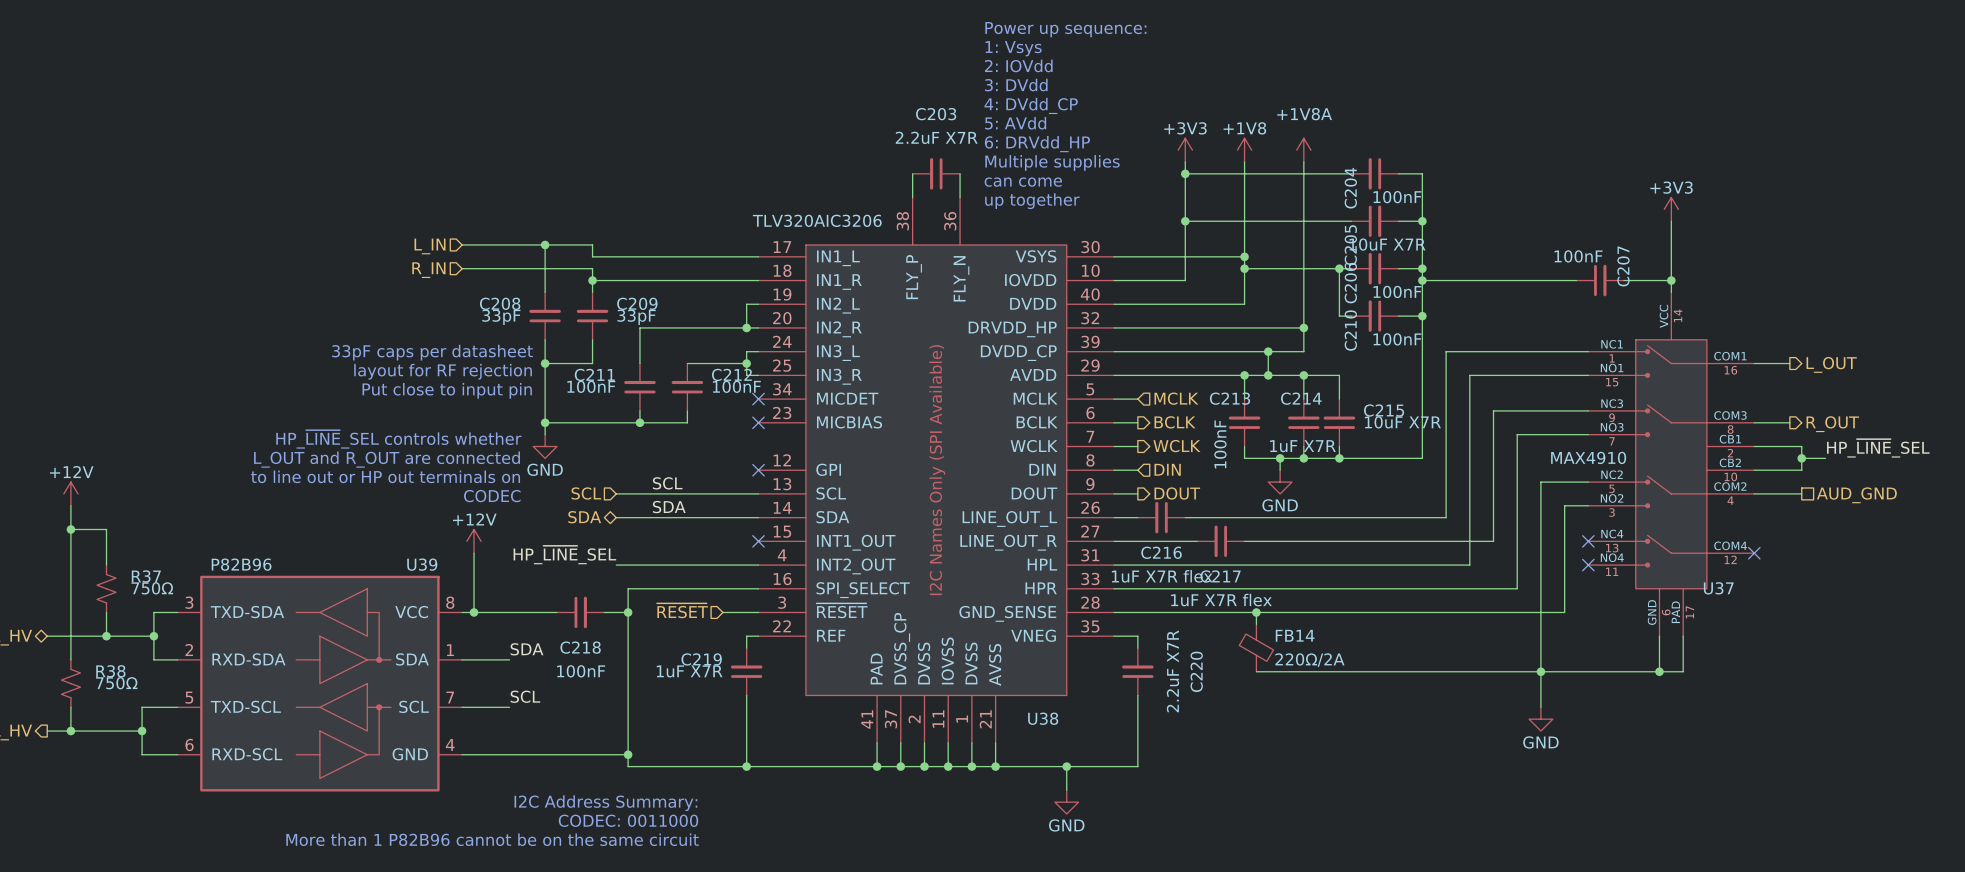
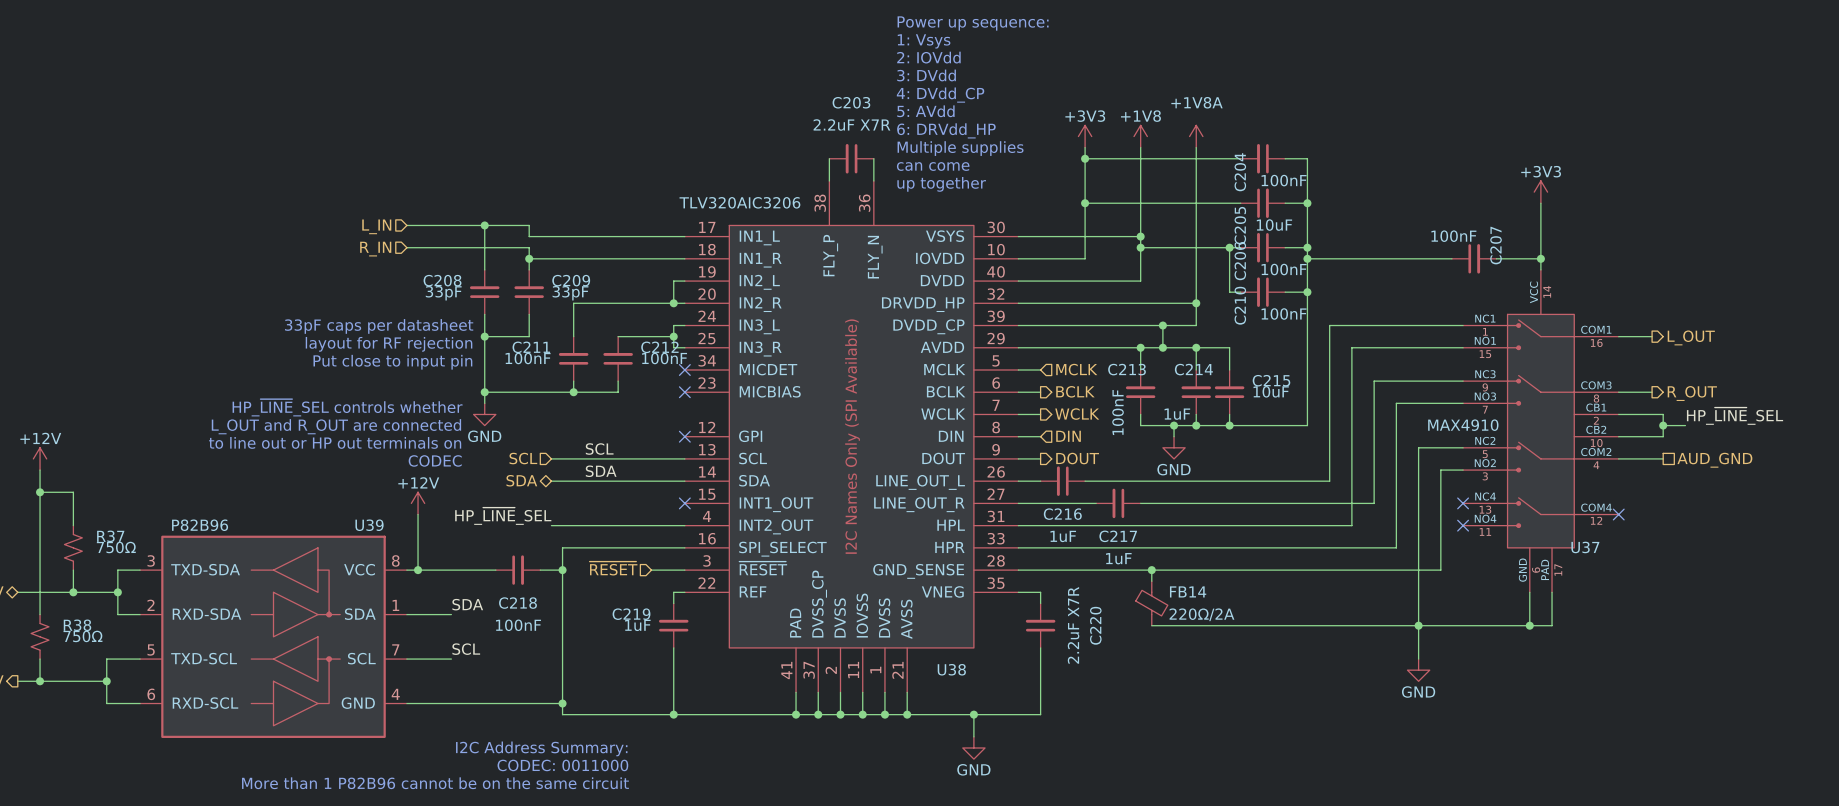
C205 value: 10uF X7R (1387, 244) -> 10uF (1274, 225)
C215 value: 10uF X7R (1402, 422) -> 10uF (1271, 391)
C214 value: 1uF X7R (1302, 446) -> 1uF (1177, 414)
C216 value: 1uF X7R flex (1162, 576) -> 1uF (1063, 536)
C217 value: 1uF X7R flex (1221, 600) -> 1uF (1118, 558)
C219 value: 1uF X7R (689, 671) -> 1uF (637, 625)

